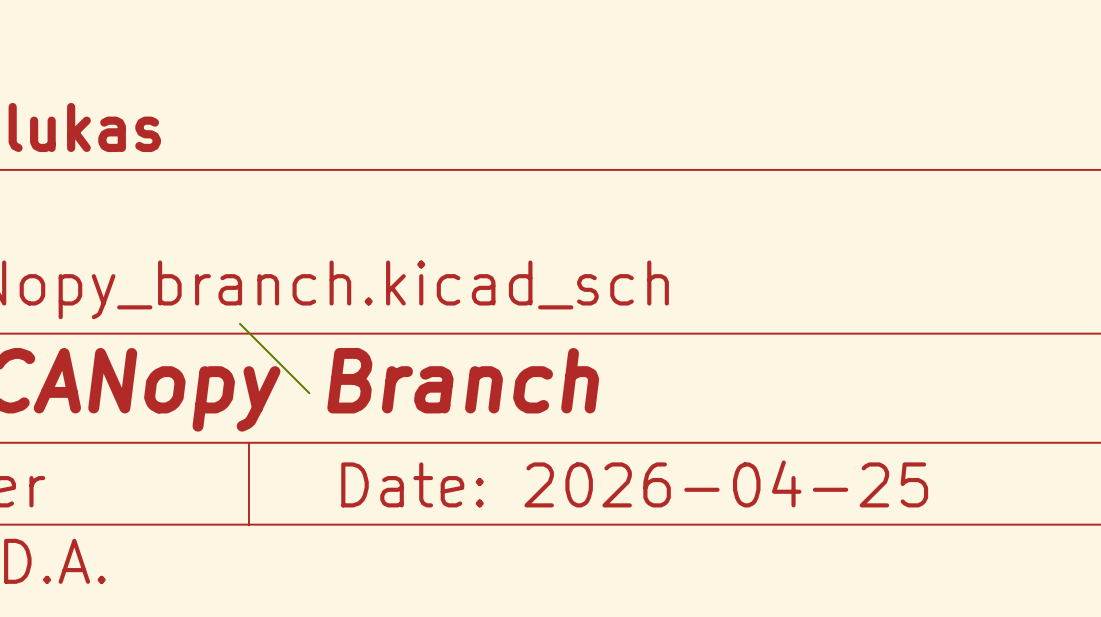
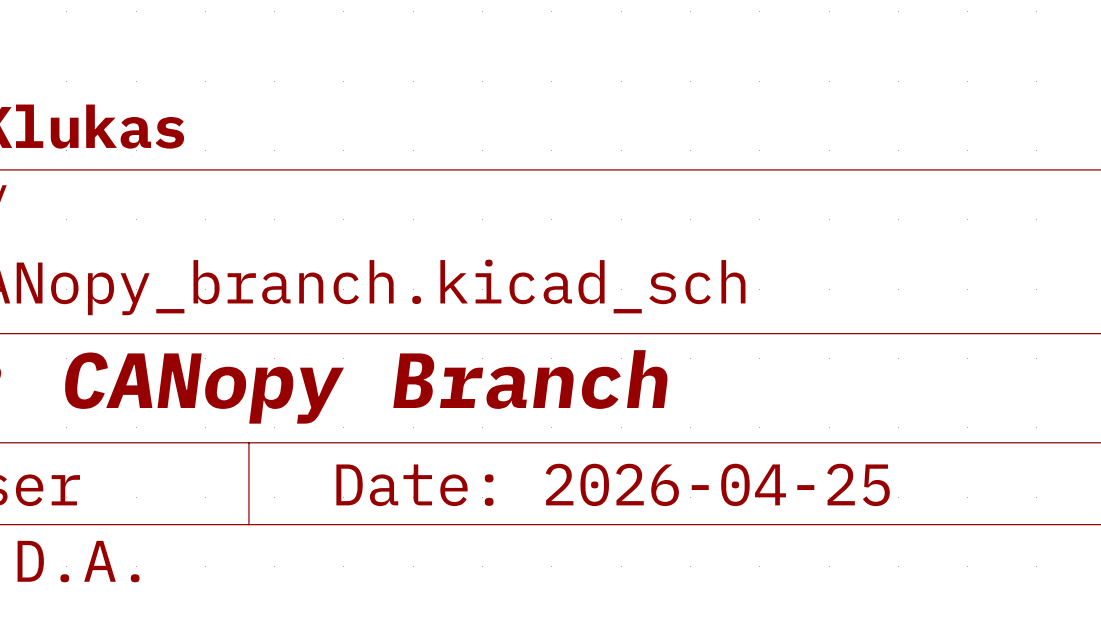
wire: (239, 323) (309, 393) -> none

